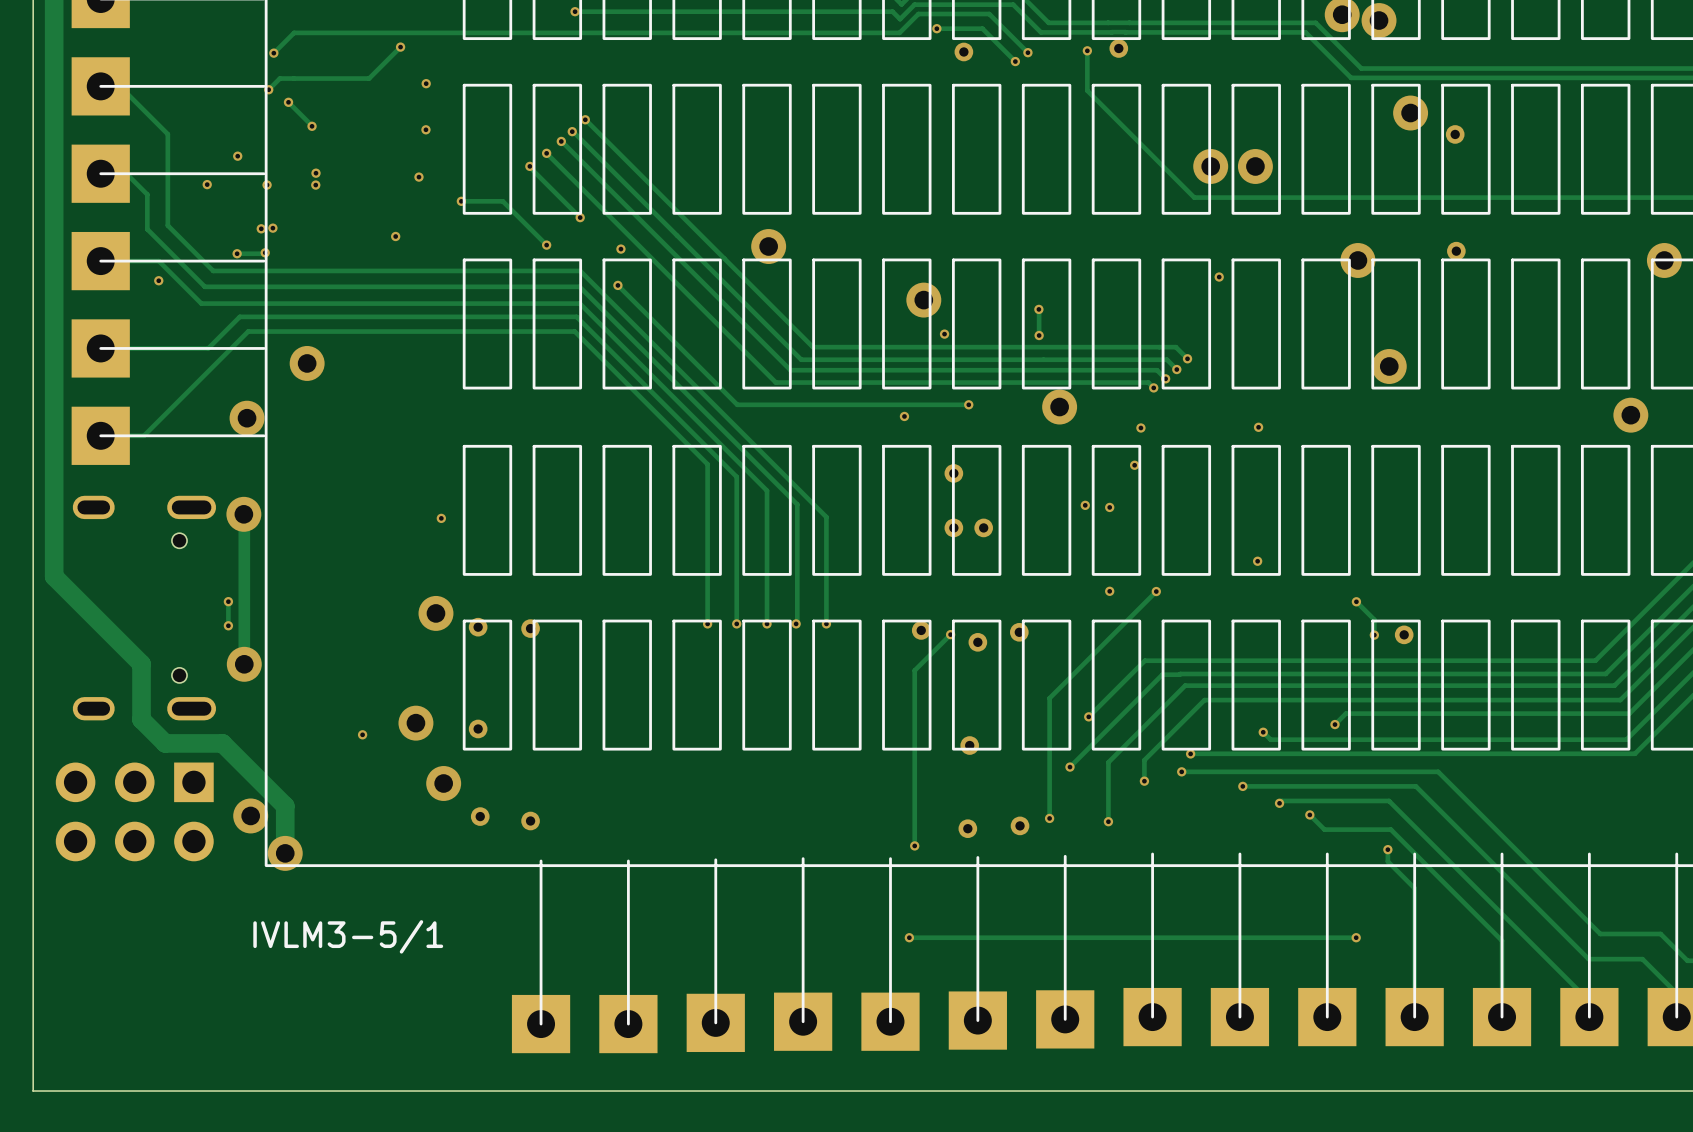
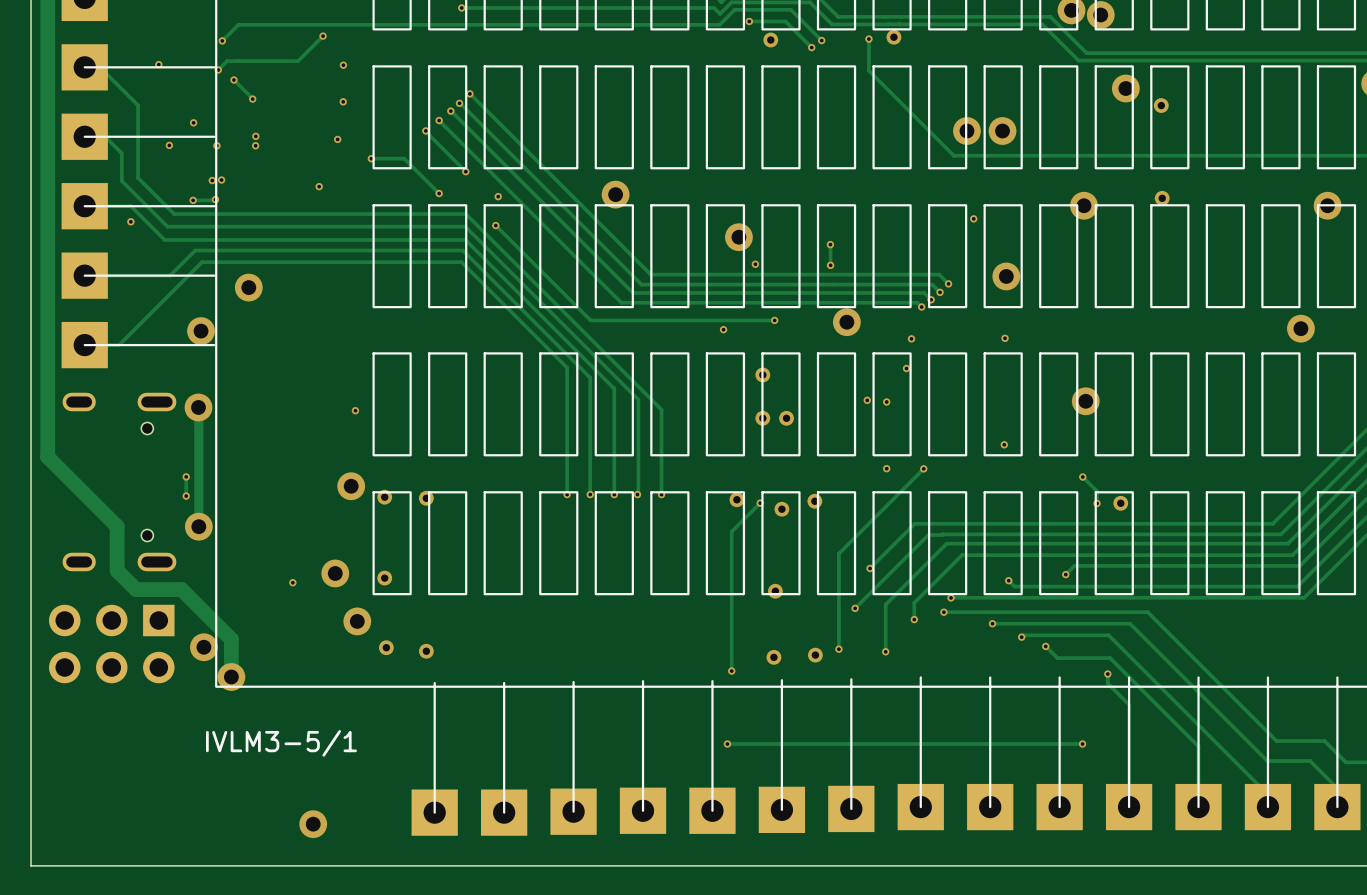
via: none -> (158, 64)
via: none -> (1006, 276)
via: (1389, 366) -> none
via: none -> (1085, 401)
via: none -> (313, 824)

